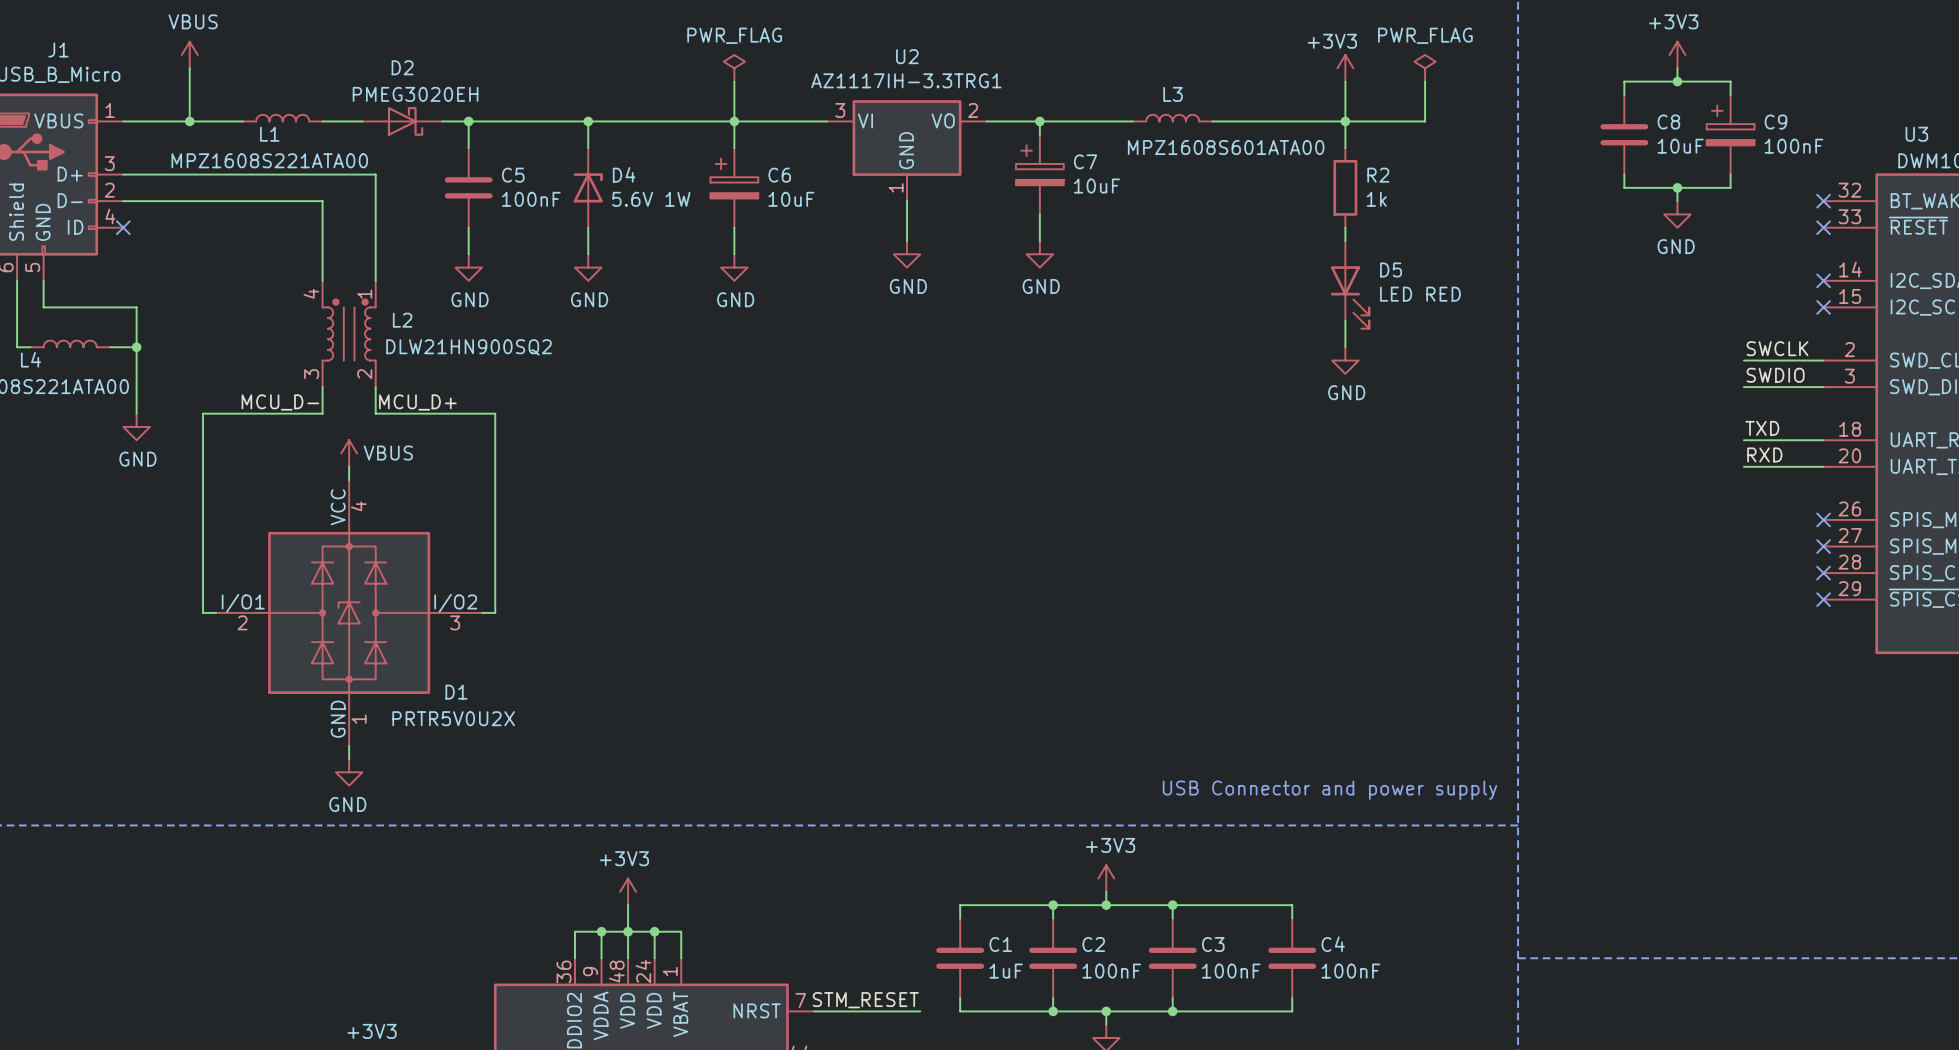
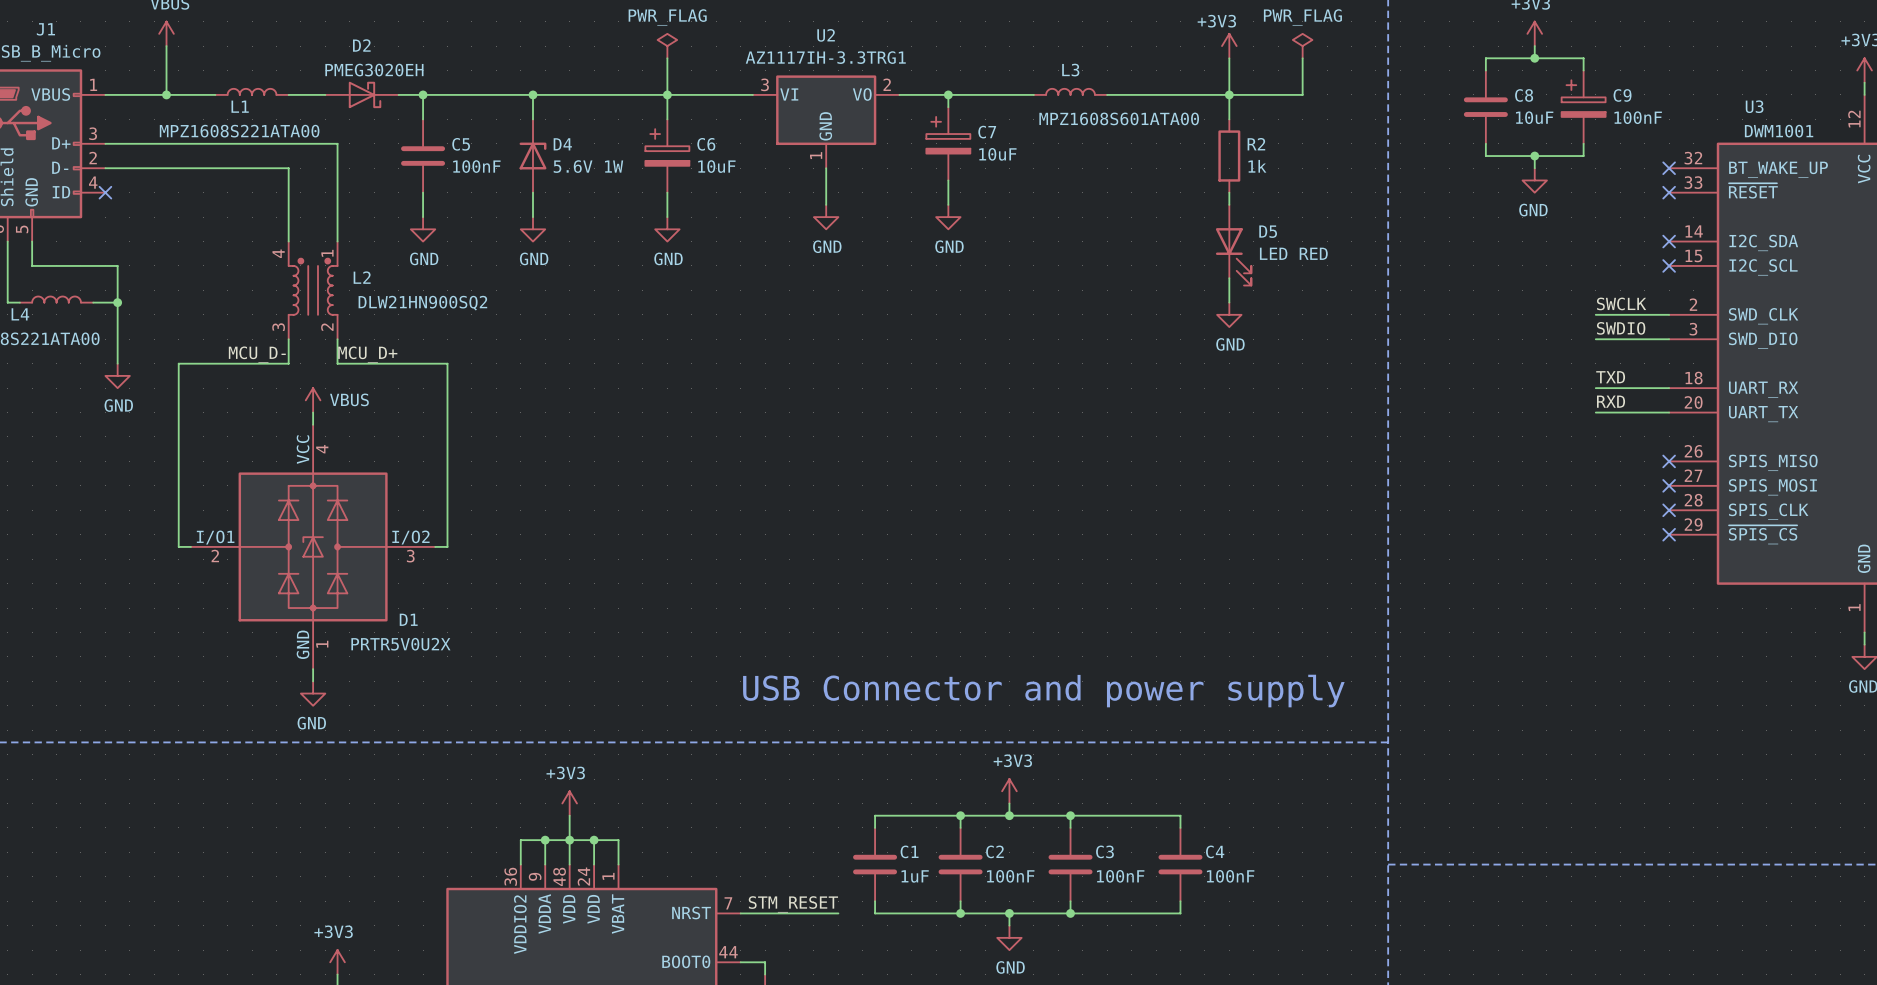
text: none -> USB Connector and power supply (1043, 691)
text: USB Connector and power supply (1329, 790) -> none

